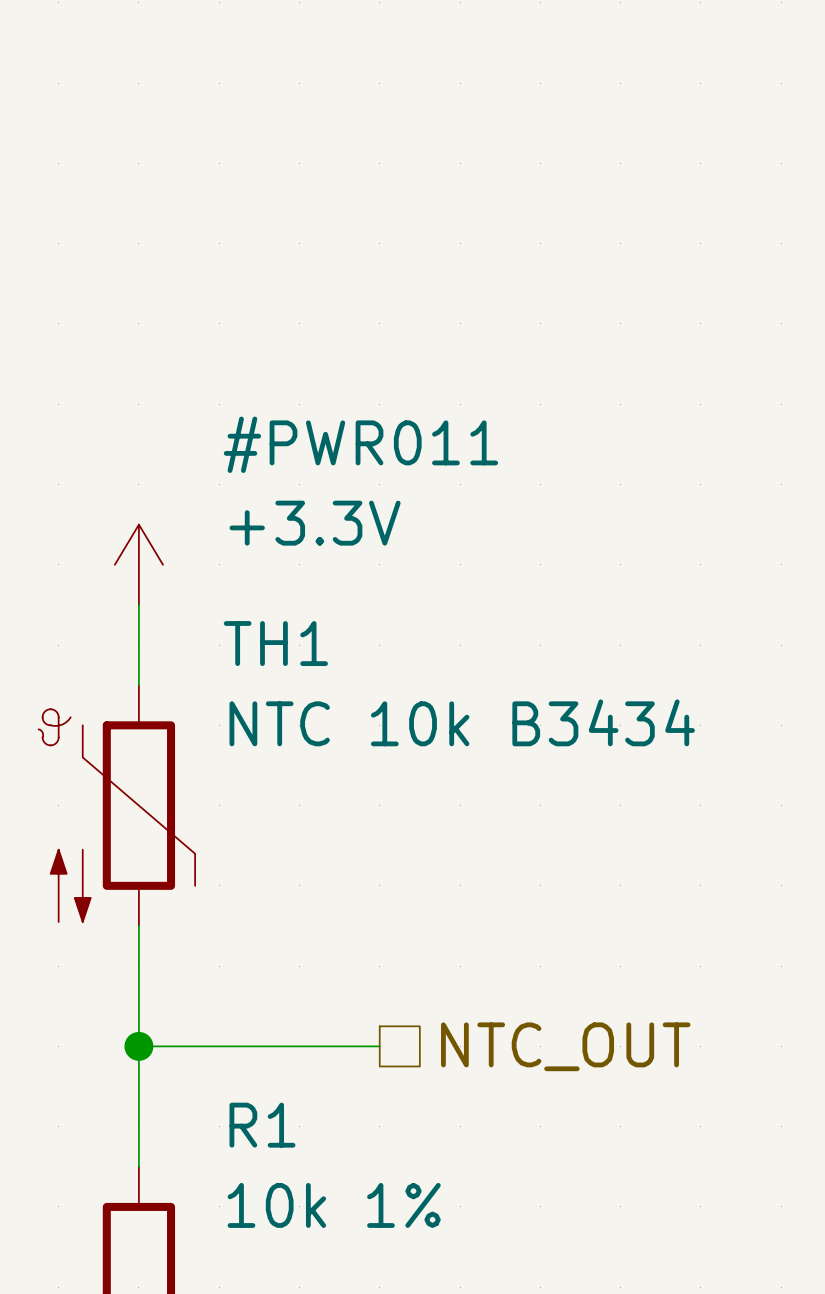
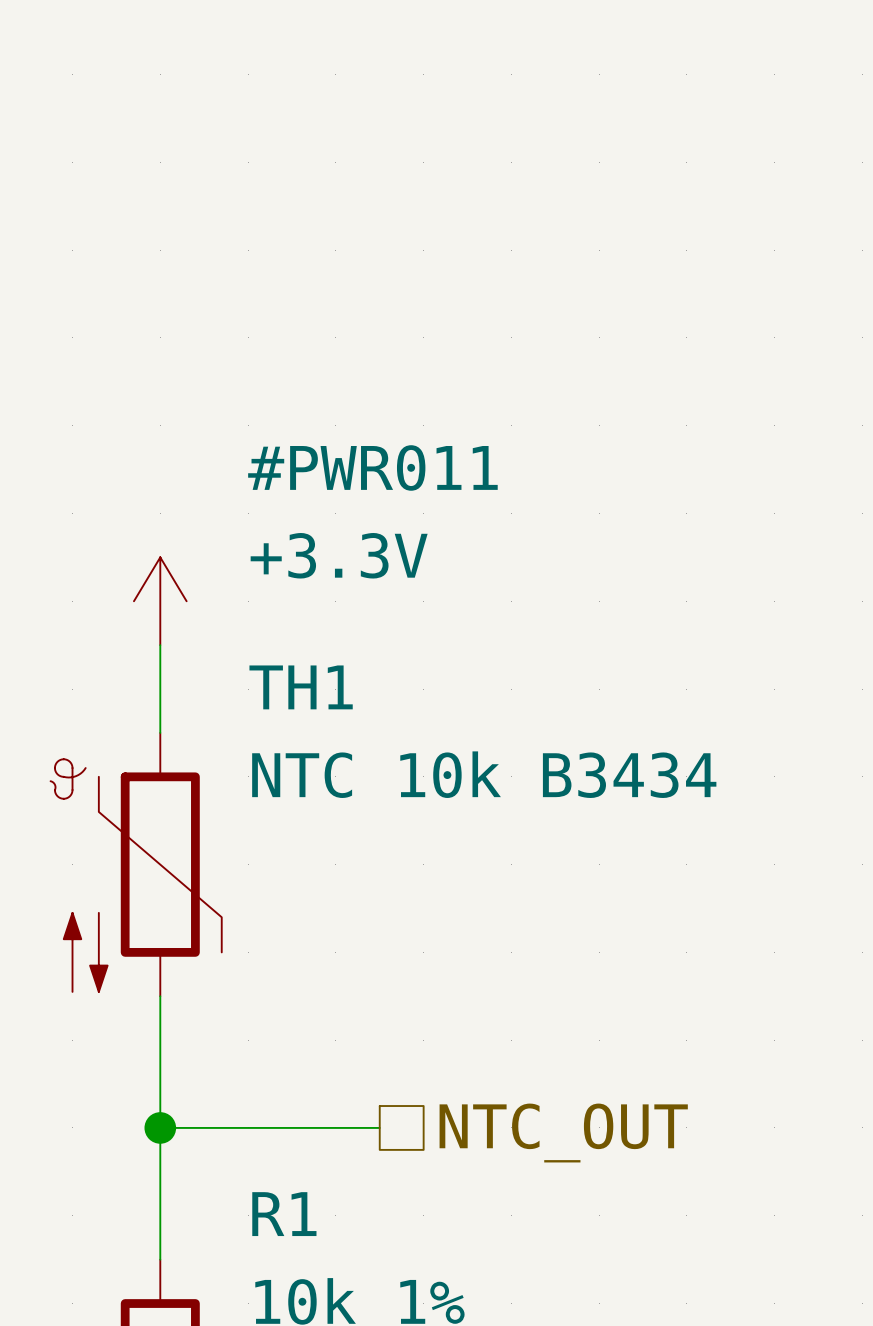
wire: (339, 1046) (379, 1046) -> none
hierarchical label position: NTC_OUT (565, 1046) -> NTC_OUT (563, 1133)

